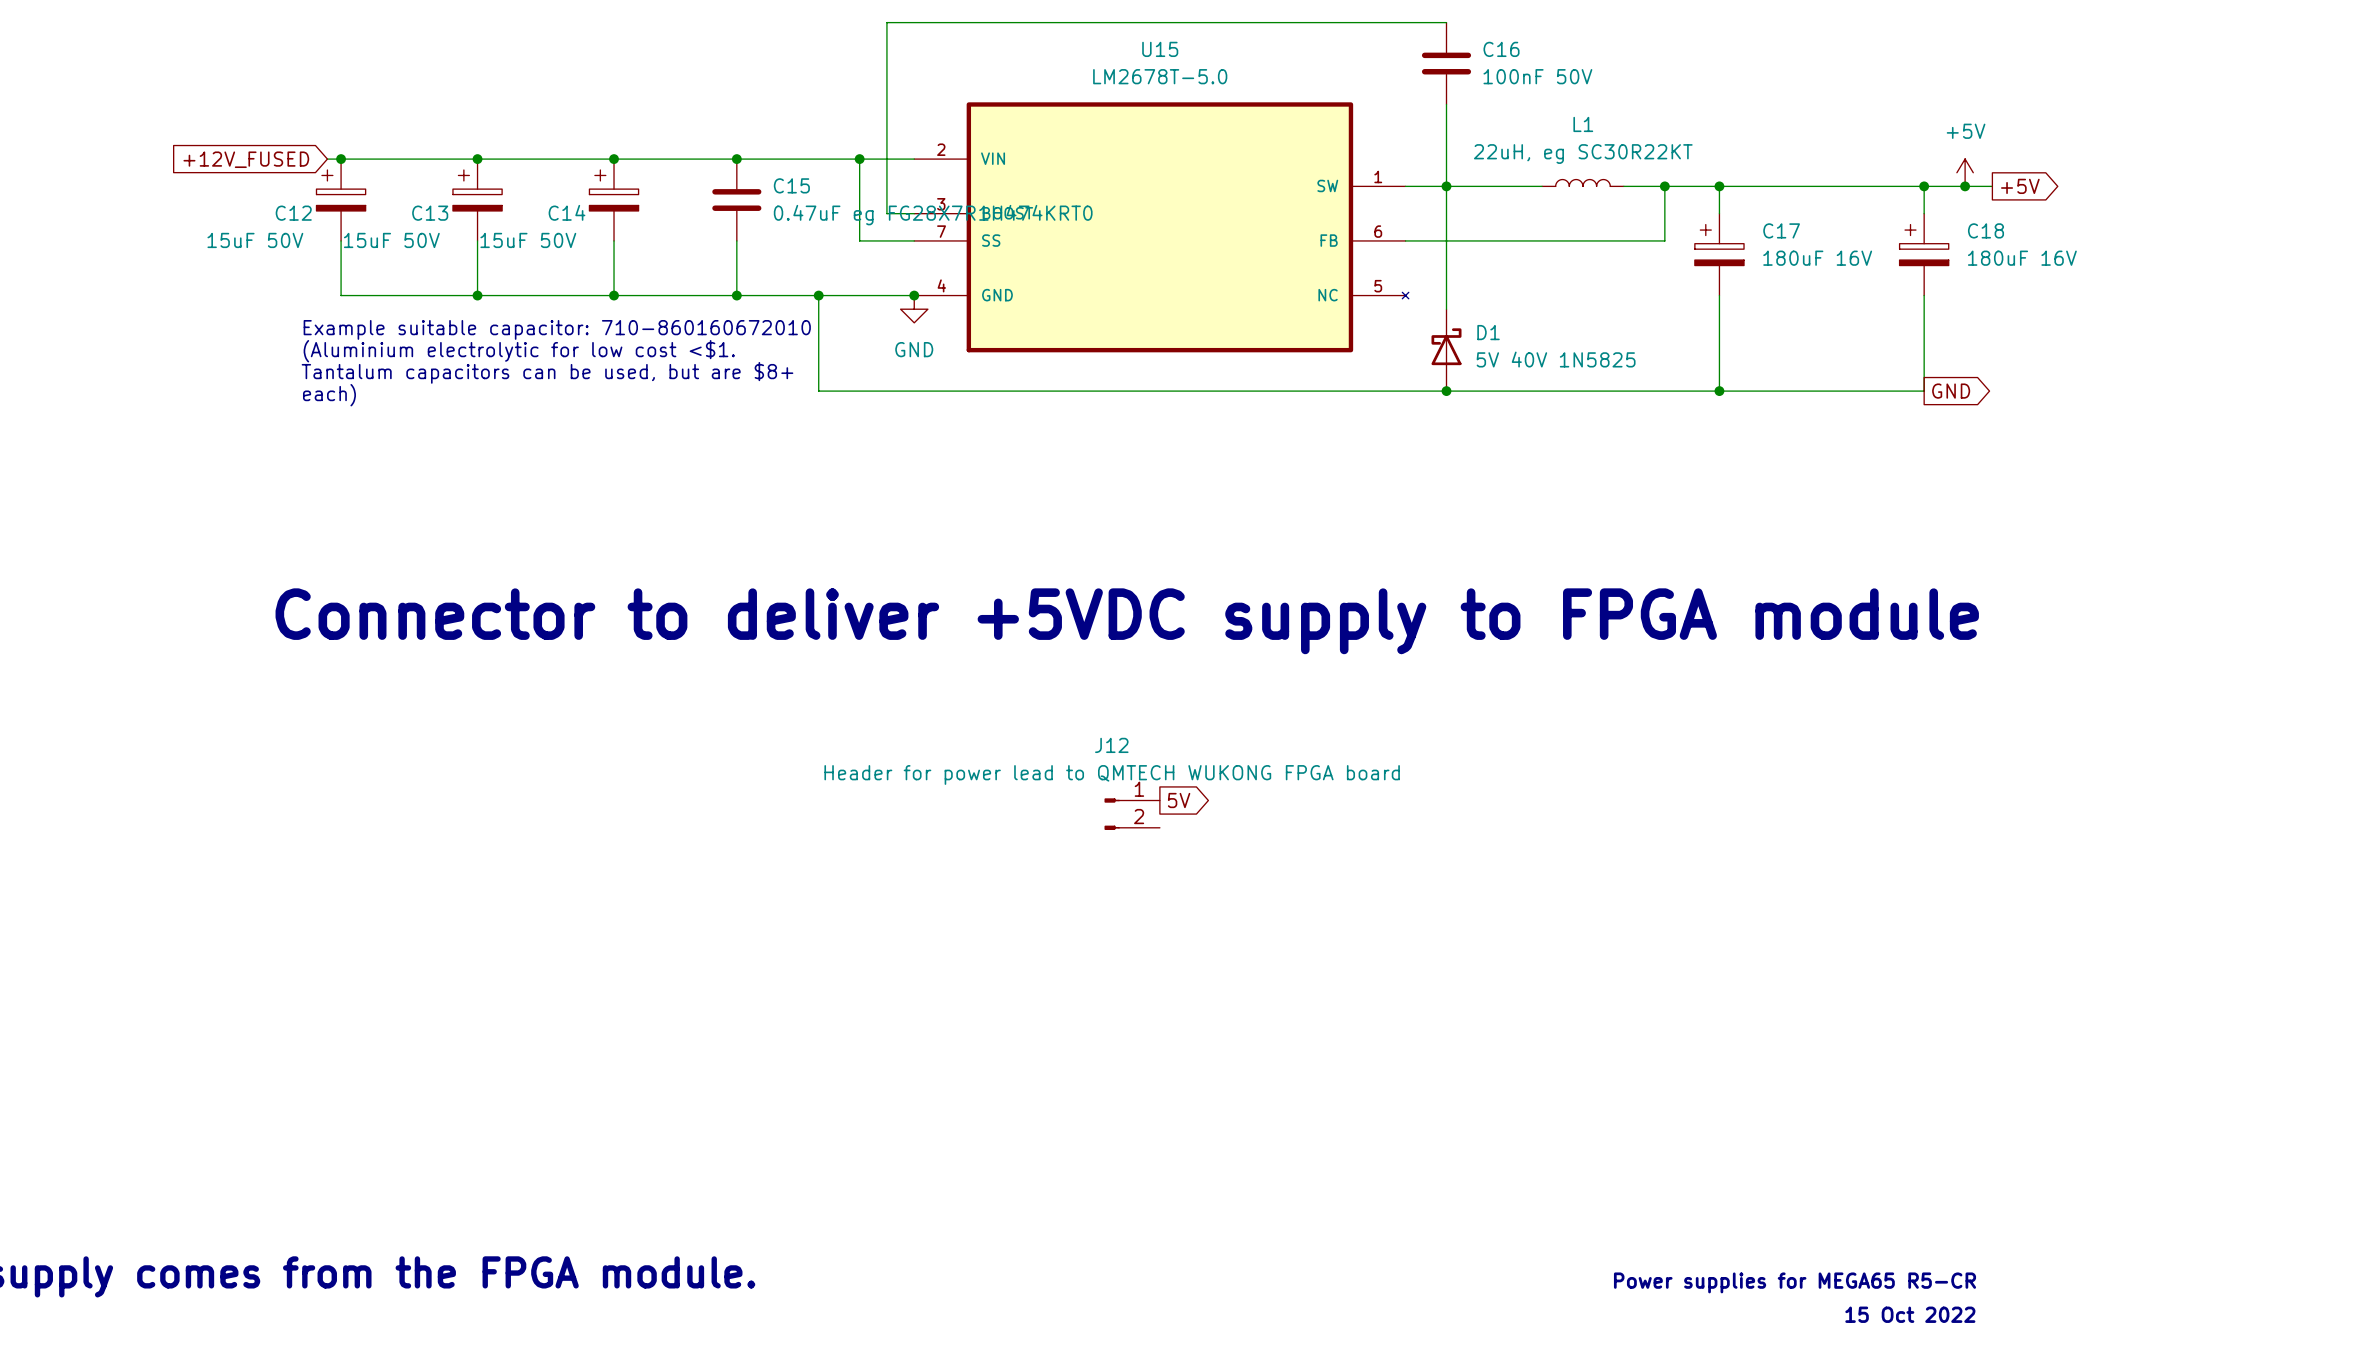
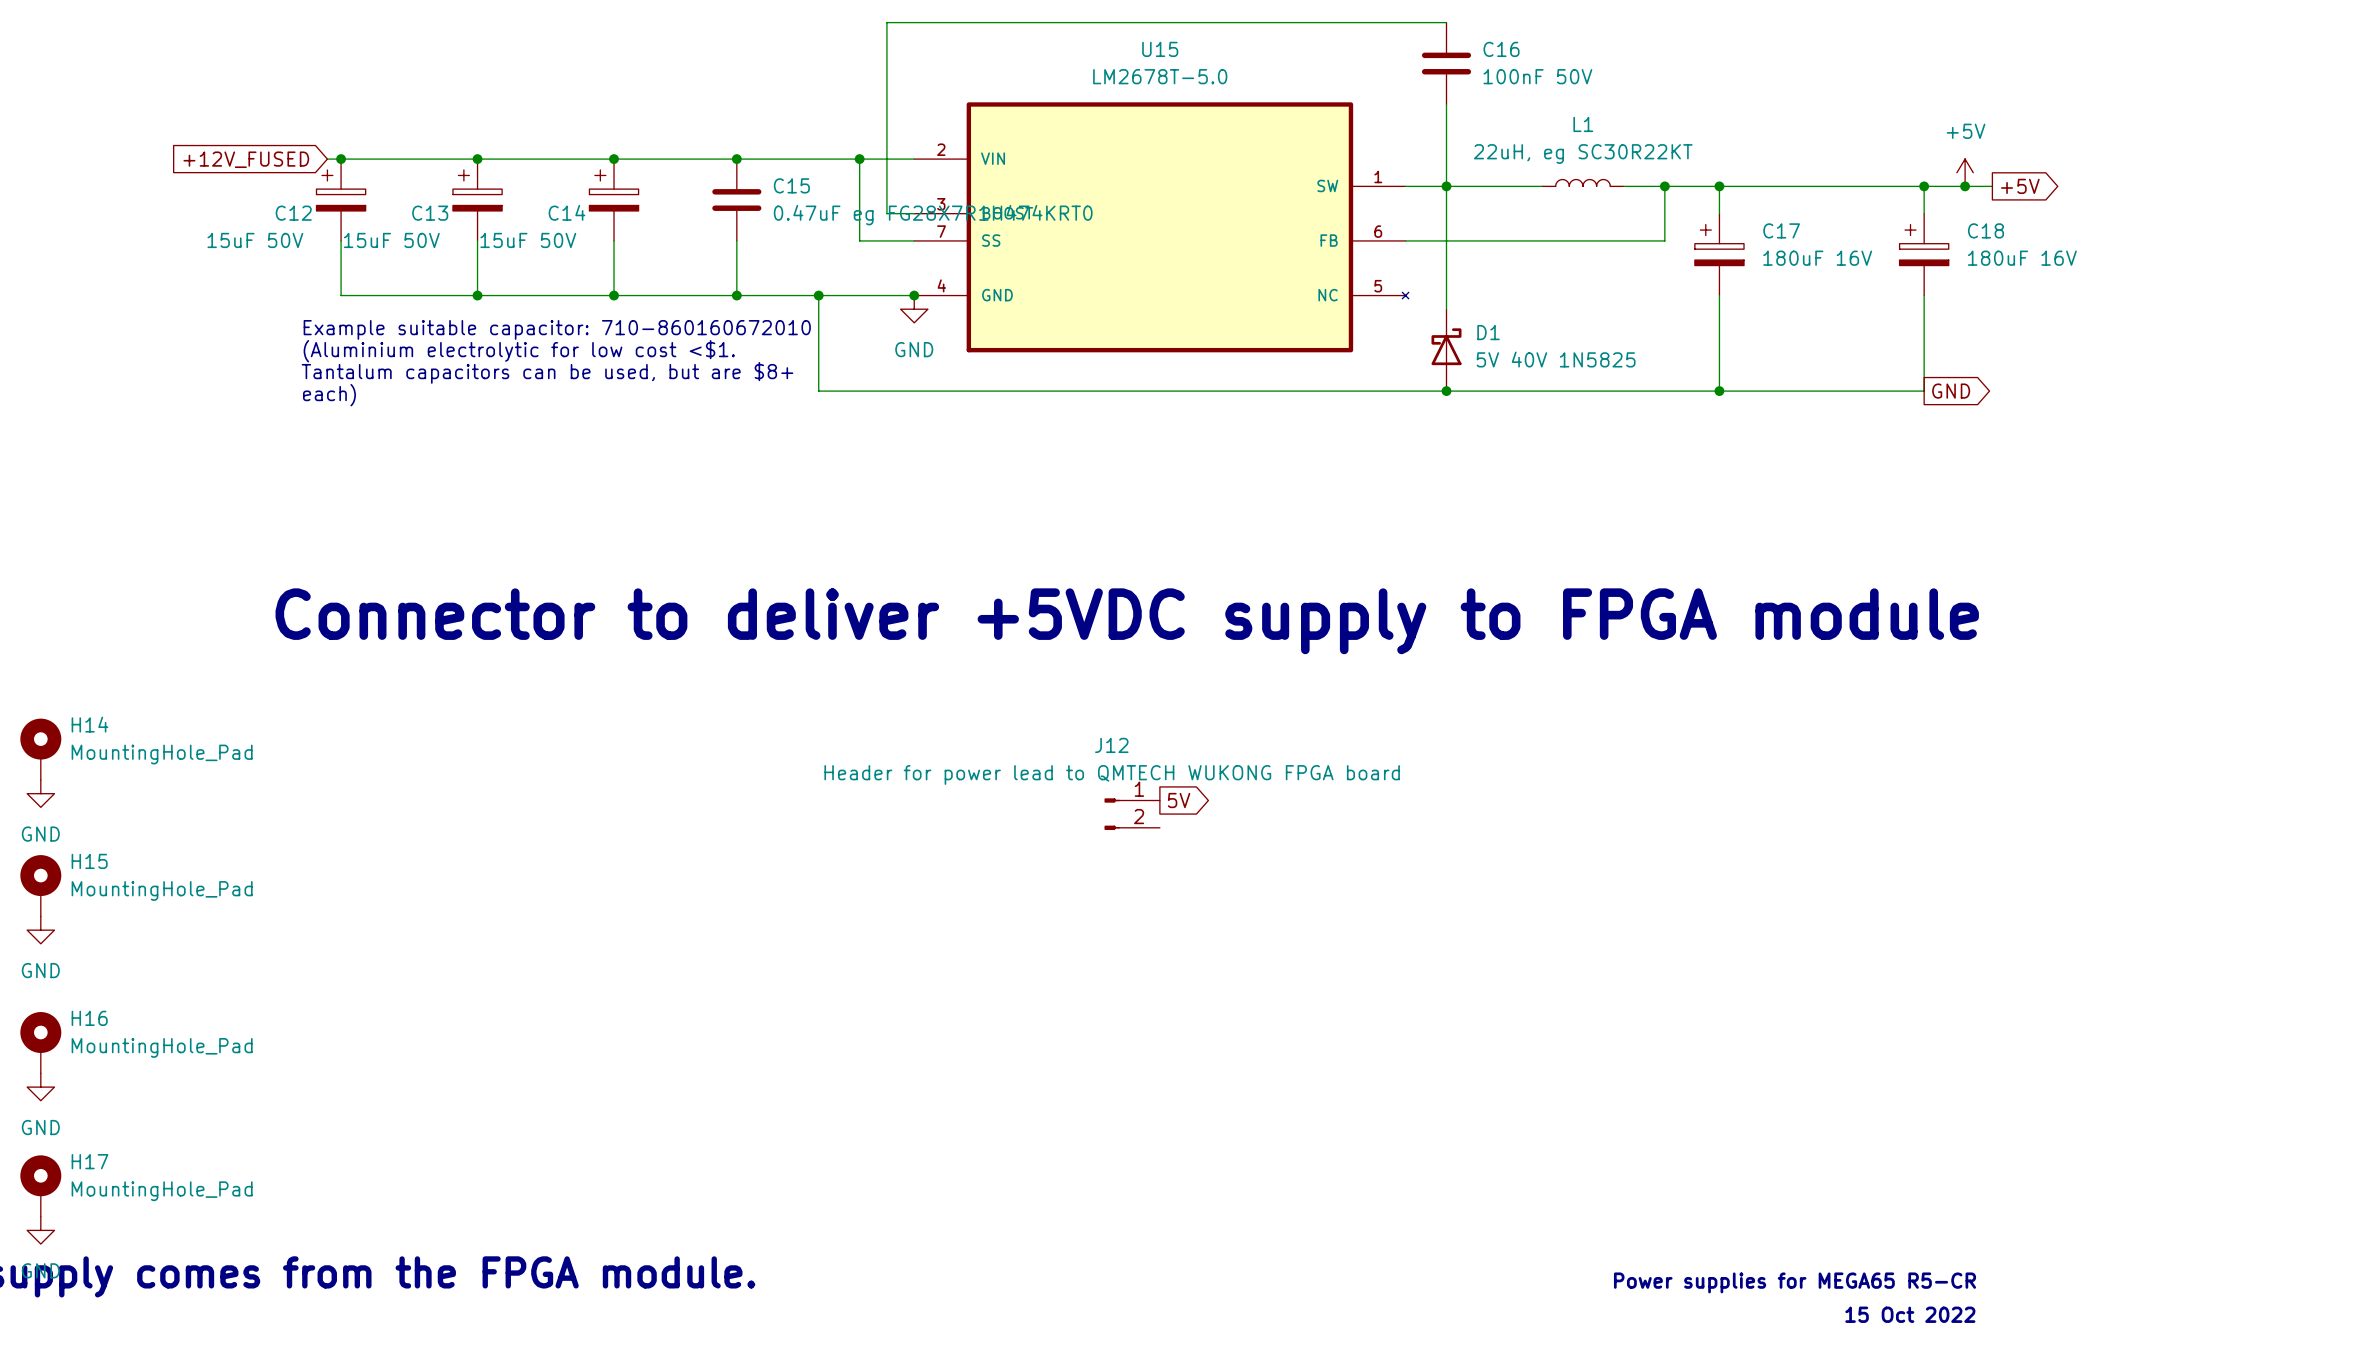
H14: none -> MountingHole_Pad (40, 749)
power symbol: none -> GND (40, 793)
H15: none -> MountingHole_Pad (40, 885)
power symbol: none -> GND (40, 930)
H16: none -> MountingHole_Pad (40, 1042)
power symbol: none -> GND (40, 1087)
H17: none -> MountingHole_Pad (40, 1186)
power symbol: none -> GND (40, 1230)

